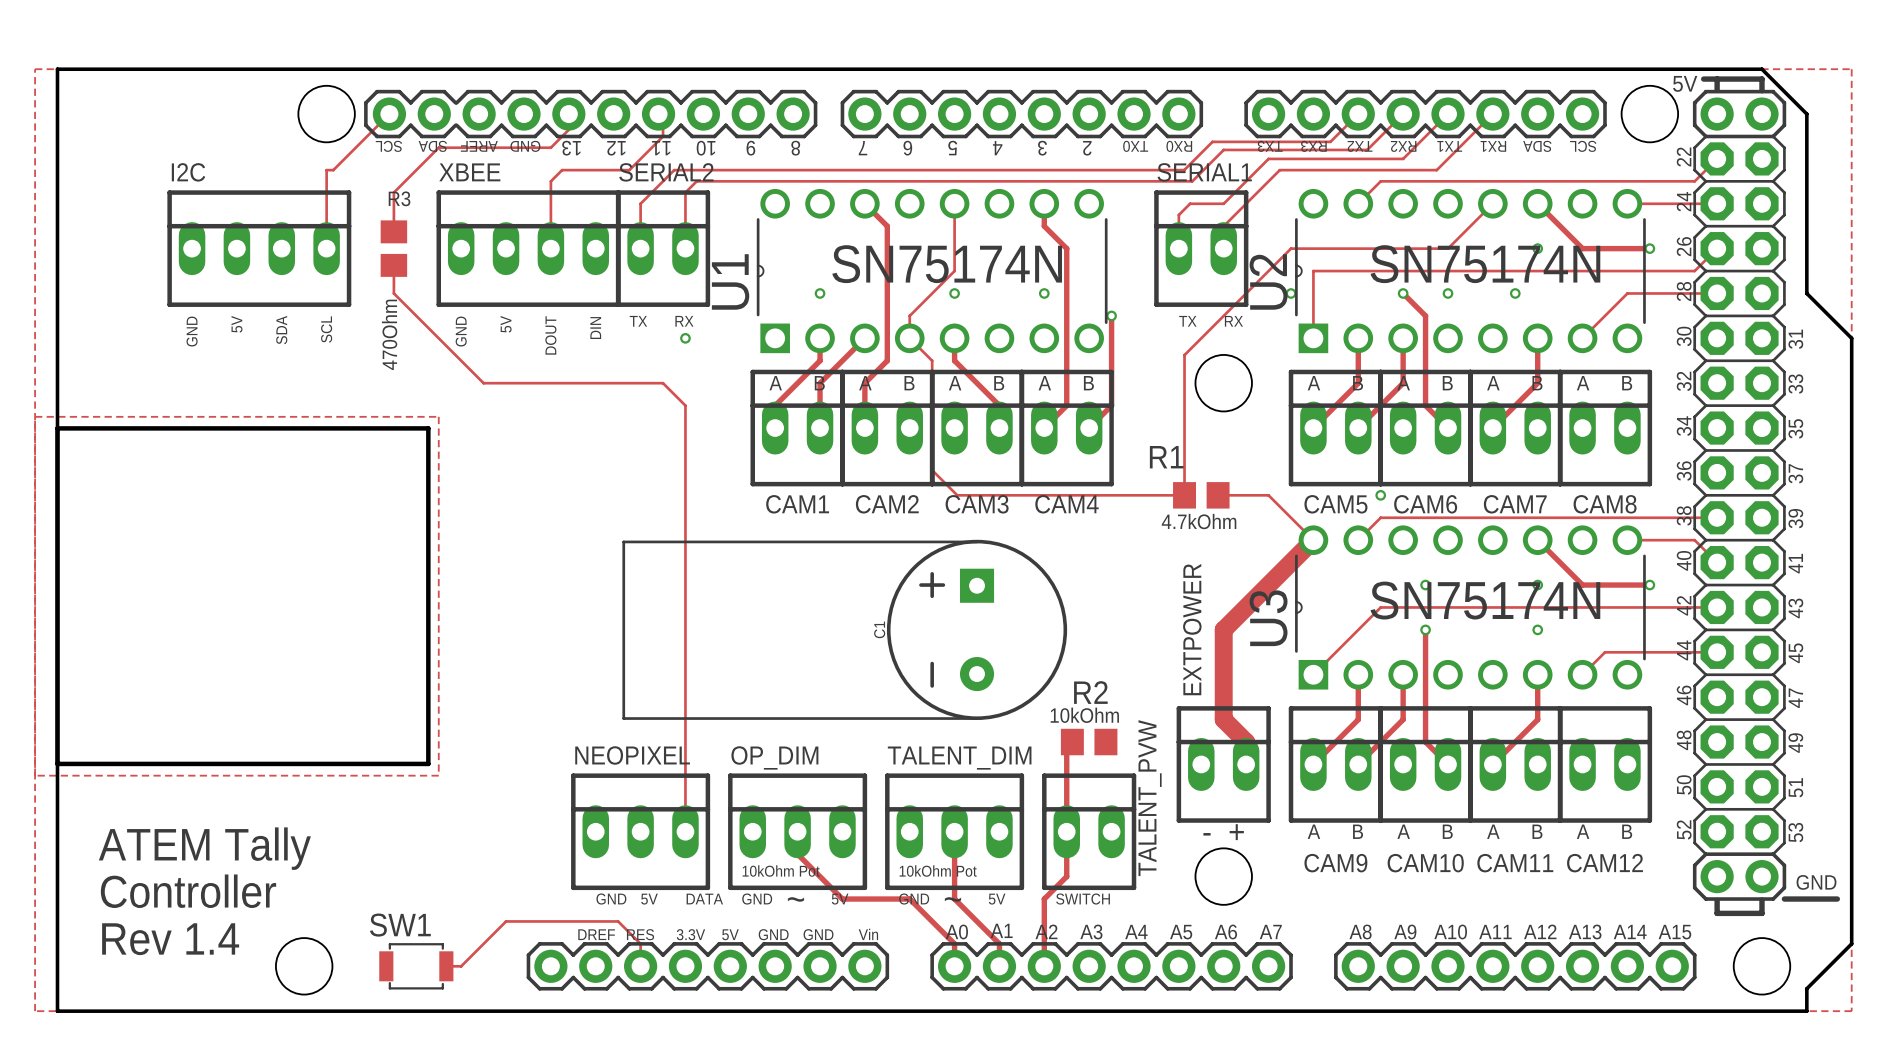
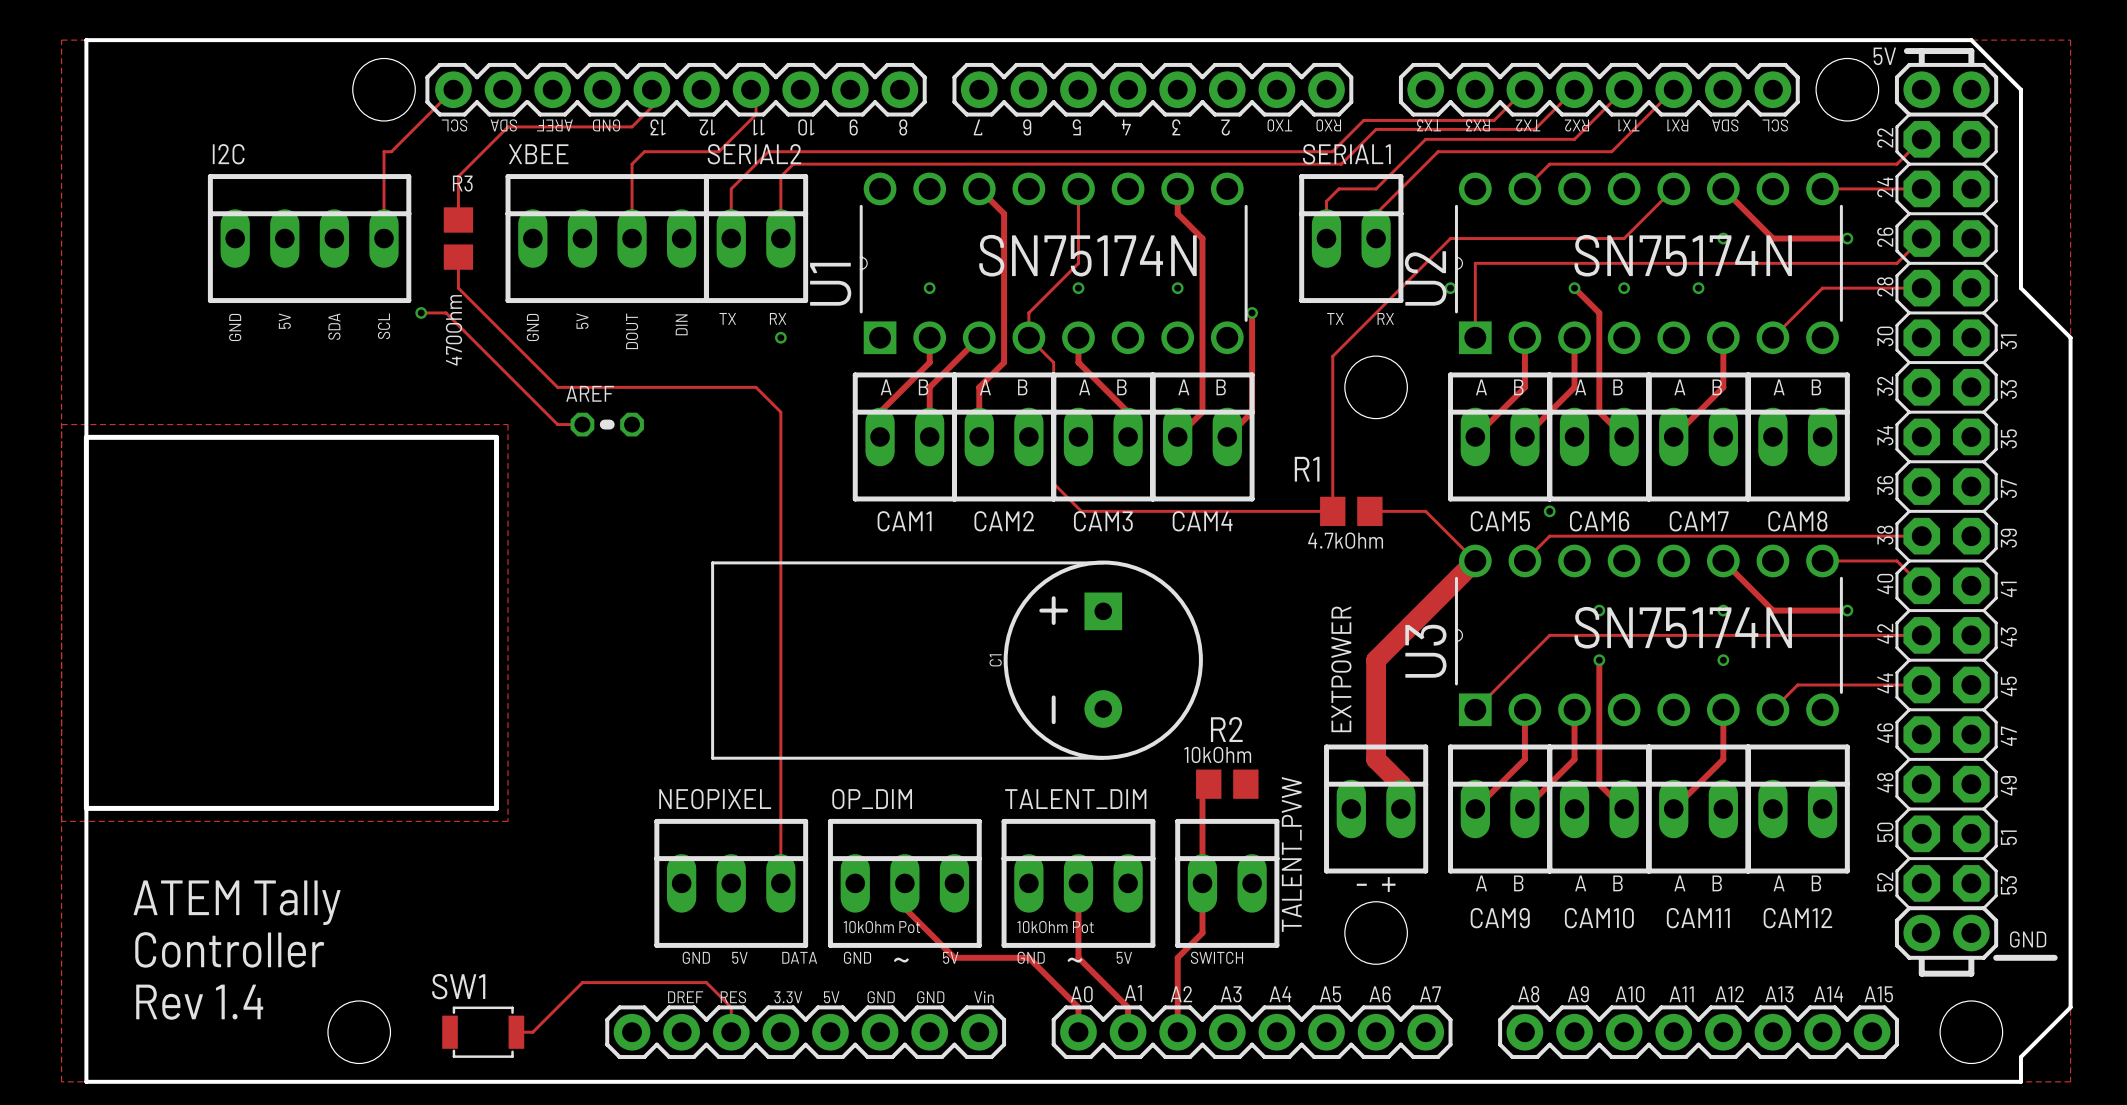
track: none -> (421, 312) (446, 312) (557, 424) (582, 424)
via: none -> (421, 312)
AREF: none -> (607, 424)

